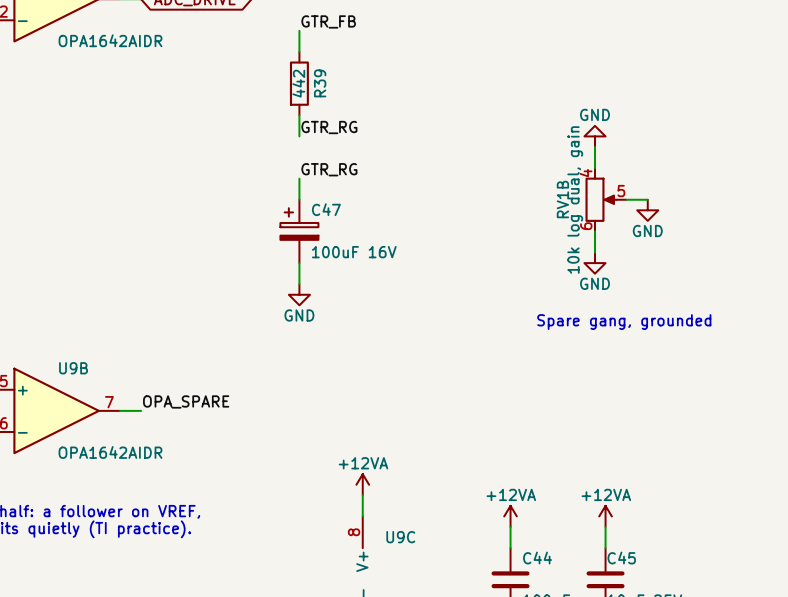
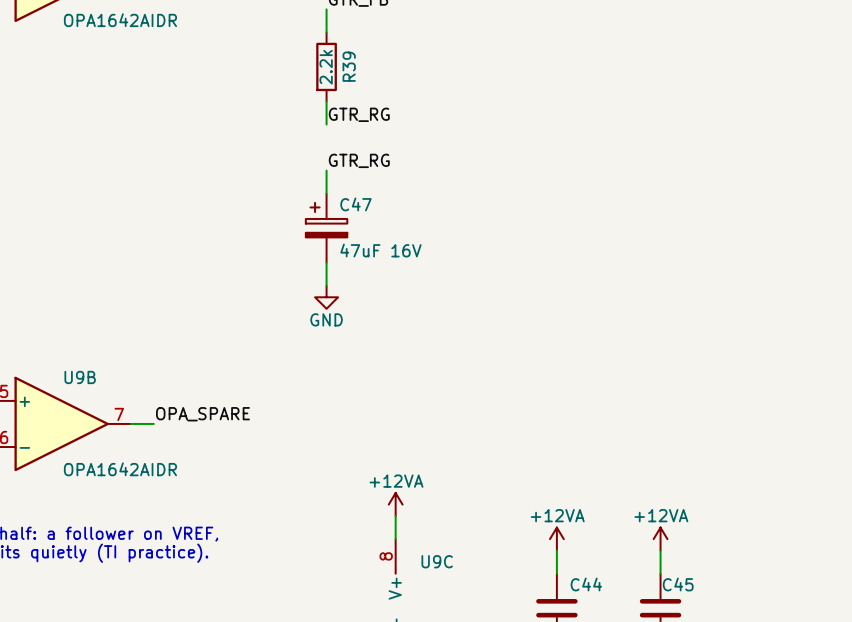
R39 value: 442 (298, 83) -> 2.2k (326, 67)
power symbol: GND (594, 136) -> none
wire: (594, 146) (594, 168) -> none
RV1B: 10k log dual, gain (606, 199) -> none
wire: (626, 199) (647, 199) -> none
power symbol: GND (647, 210) -> none
wire: (594, 231) (594, 252) -> none
C47 value: 100uF 16V (354, 252) -> 47uF 16V (380, 250)
power symbol: GND (594, 263) -> none
text: Spare gang, grounded (624, 322) -> none

